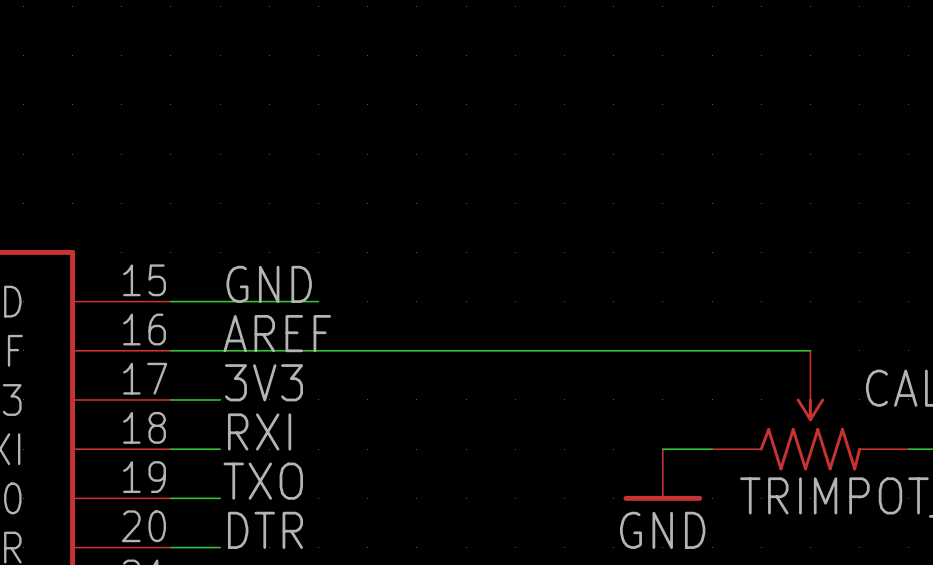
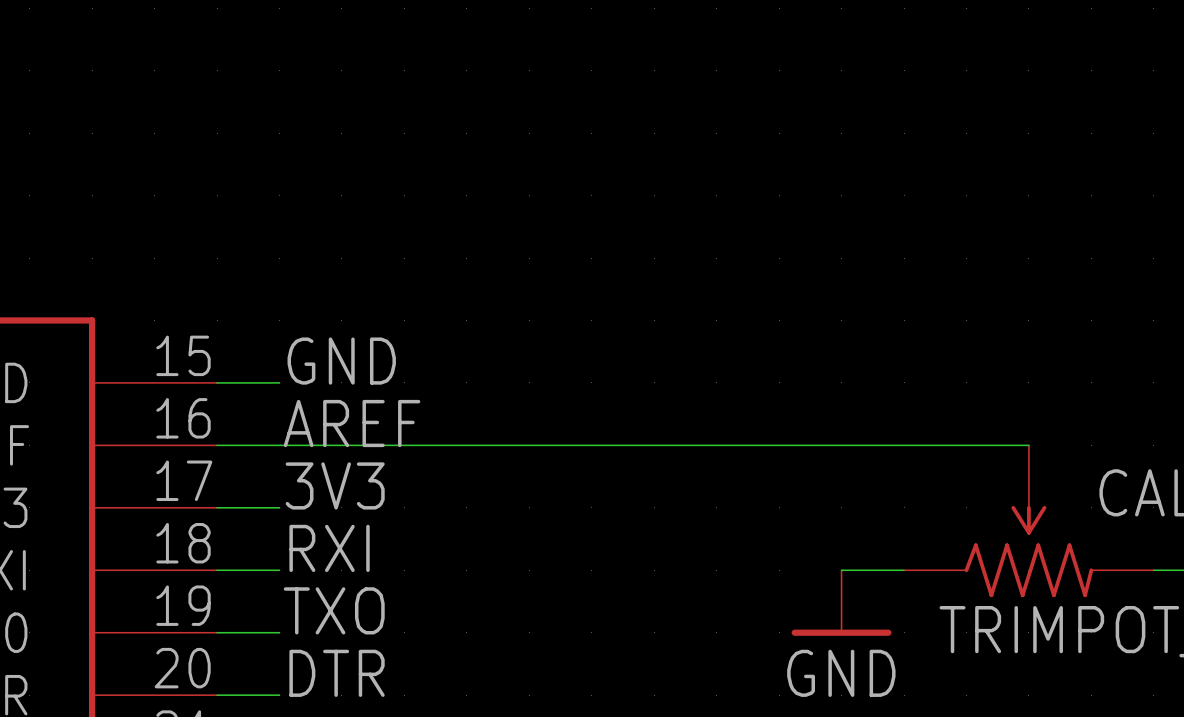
wire: (220, 301) (318, 301) -> none

